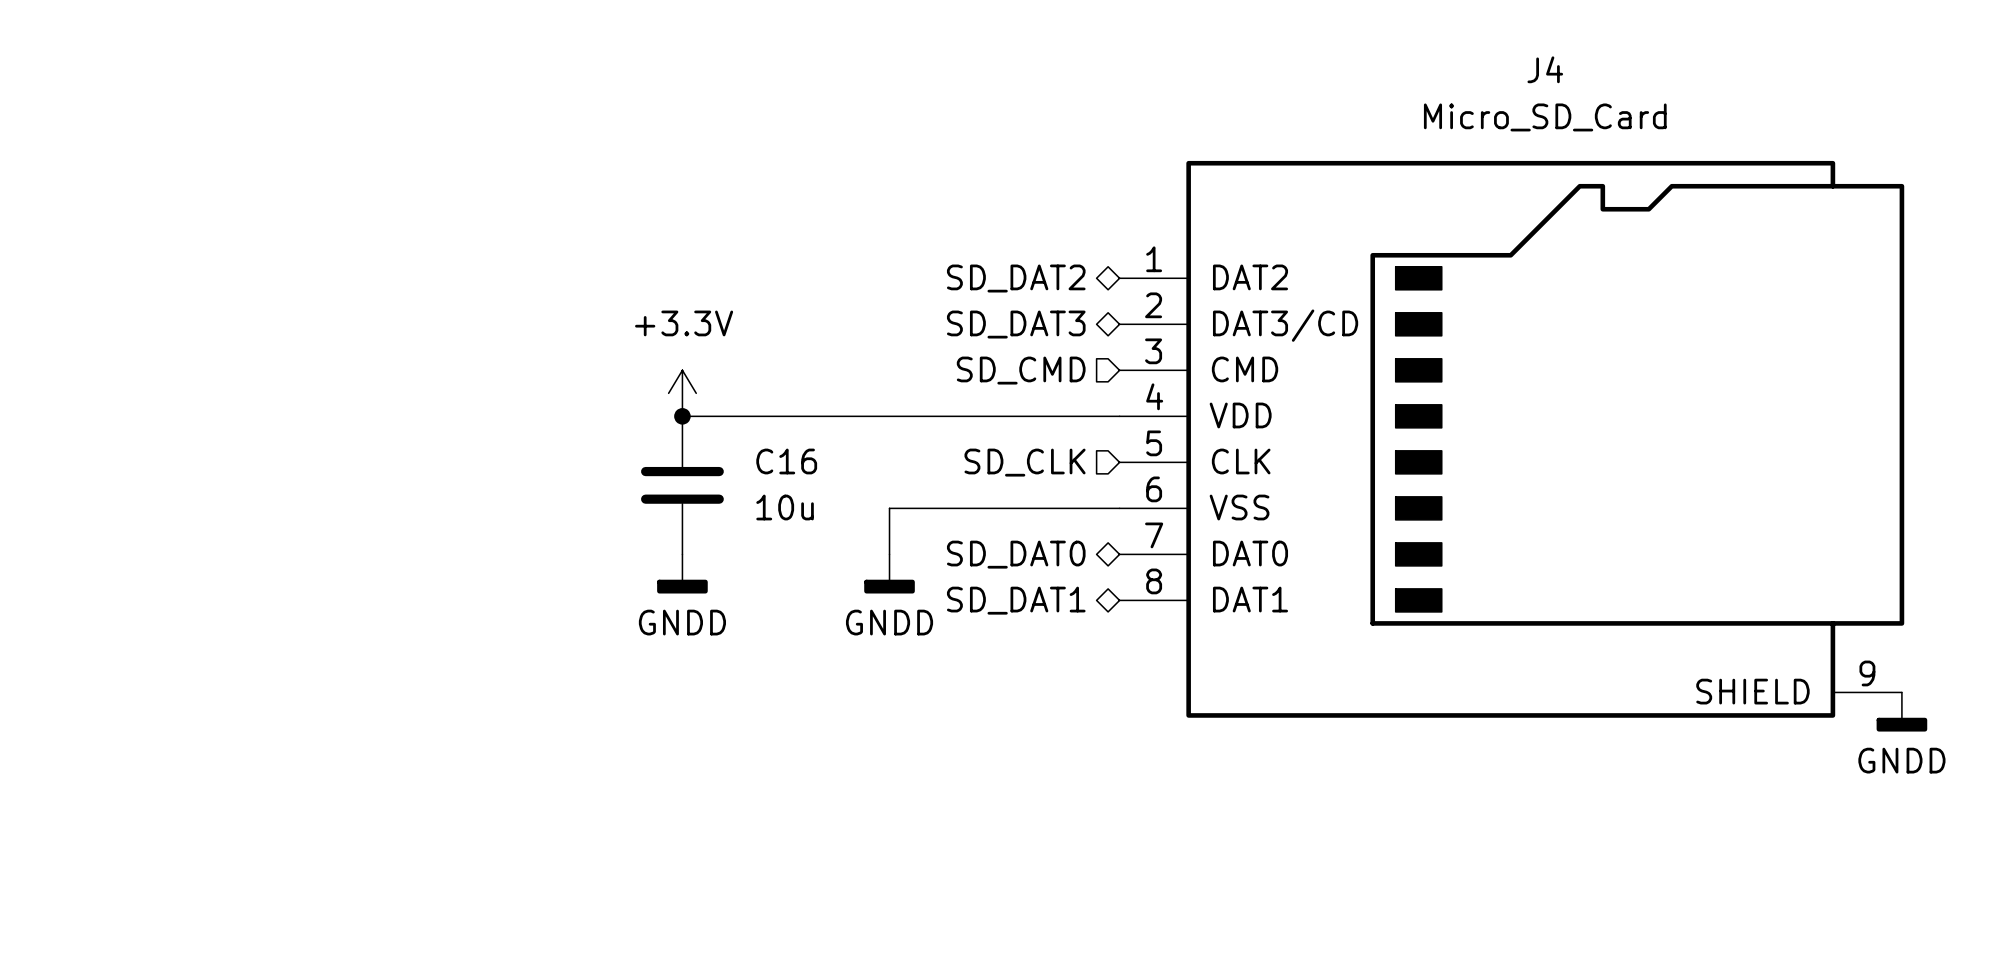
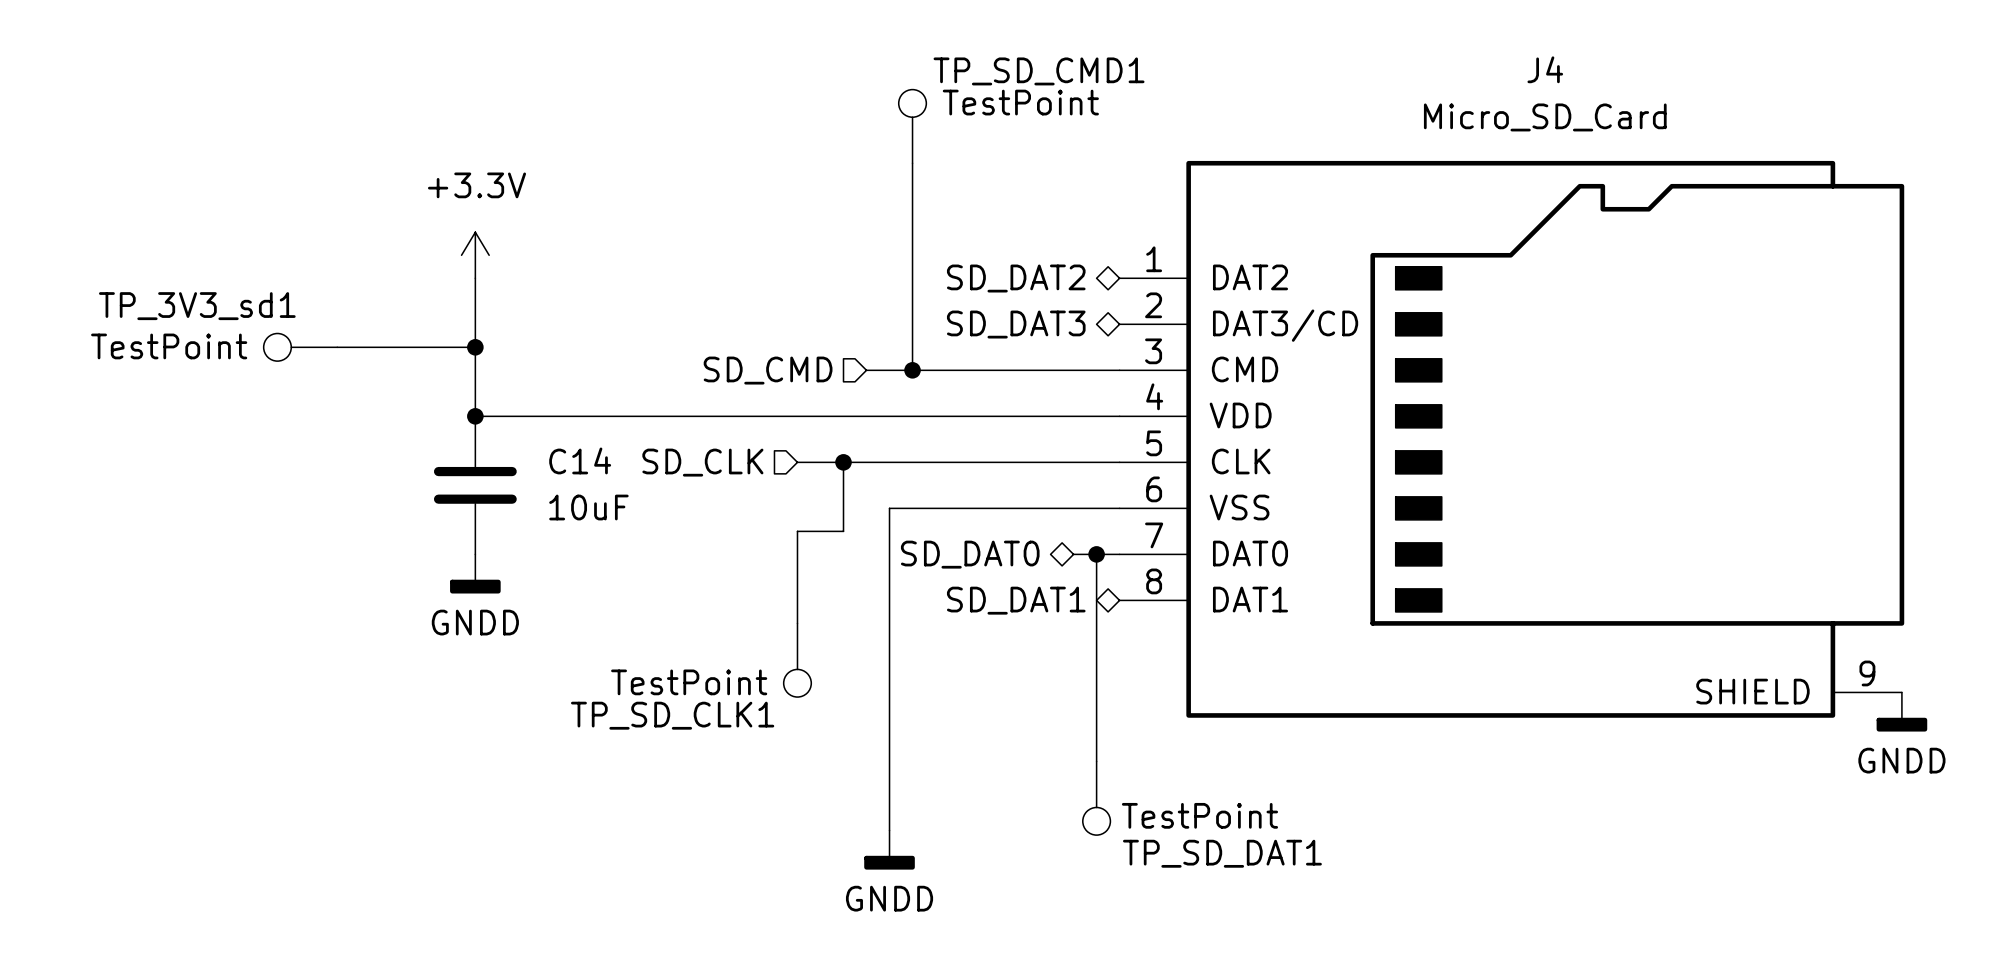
TP_SD_CMD1: none -> TestPoint (912, 126)
wire: none -> (912, 163) (912, 370)
wire: none -> (475, 278) (475, 416) (682, 416)
TP_3V3_sd1: none -> TestPoint (300, 347)
wire: none -> (337, 347) (475, 347)
junction: none -> (475, 347)
wire: none -> (866, 370) (1119, 370)
junction: none -> (912, 370)
hierarchical label position: SD_CMD (1021, 370) -> SD_CMD (768, 370)
power symbol position: +3.3V (682, 393) -> +3.3V (475, 255)
junction: none -> (475, 416)
junction: (682, 416) -> none
wire: none -> (797, 462) (1119, 462)
wire: none -> (843, 462) (843, 531) (797, 531) (797, 623)
junction: none -> (843, 462)
hierarchical label position: SD_CLK (1025, 462) -> SD_CLK (702, 462)
C14: none -> 10uF (475, 485)
C16: 10u (682, 485) -> none
wire: none -> (889, 554) (889, 830)
hierarchical label position: SD_DAT0 (1016, 554) -> SD_DAT0 (970, 554)
wire: none -> (1073, 554) (1119, 554)
wire: none -> (1096, 554) (1096, 761)
junction: none -> (1096, 554)
power symbol: none -> GNDD (475, 573)
power symbol: GNDD (682, 573) -> none
power symbol: GNDD (889, 573) -> none
TP_SD_CLK1: none -> TestPoint (797, 660)
TP_SD_DAT1: none -> TestPoint (1096, 798)
power symbol: none -> GNDD (889, 850)

